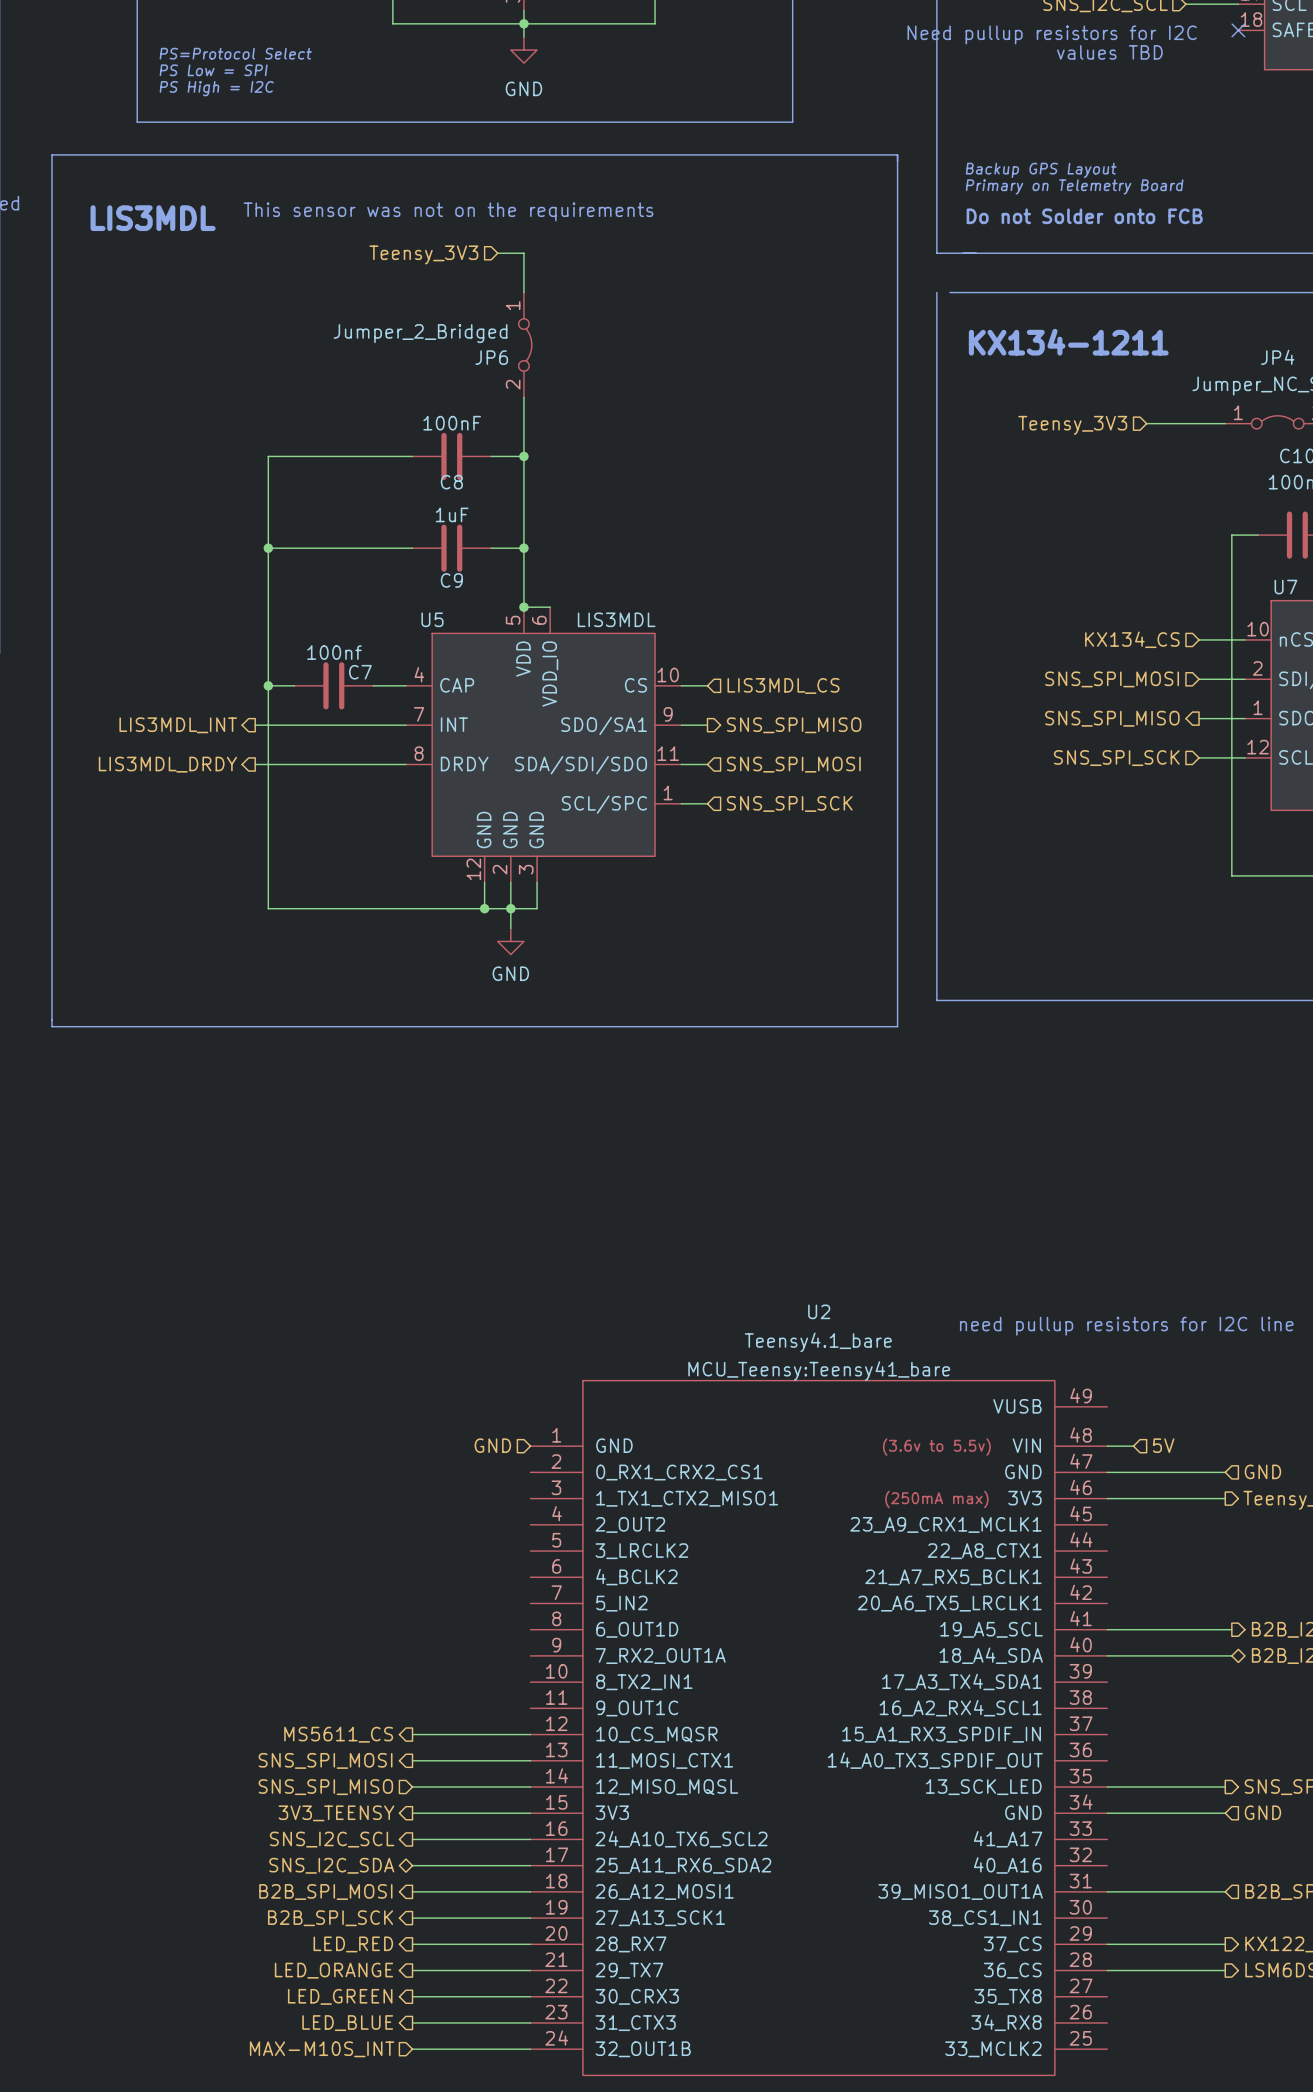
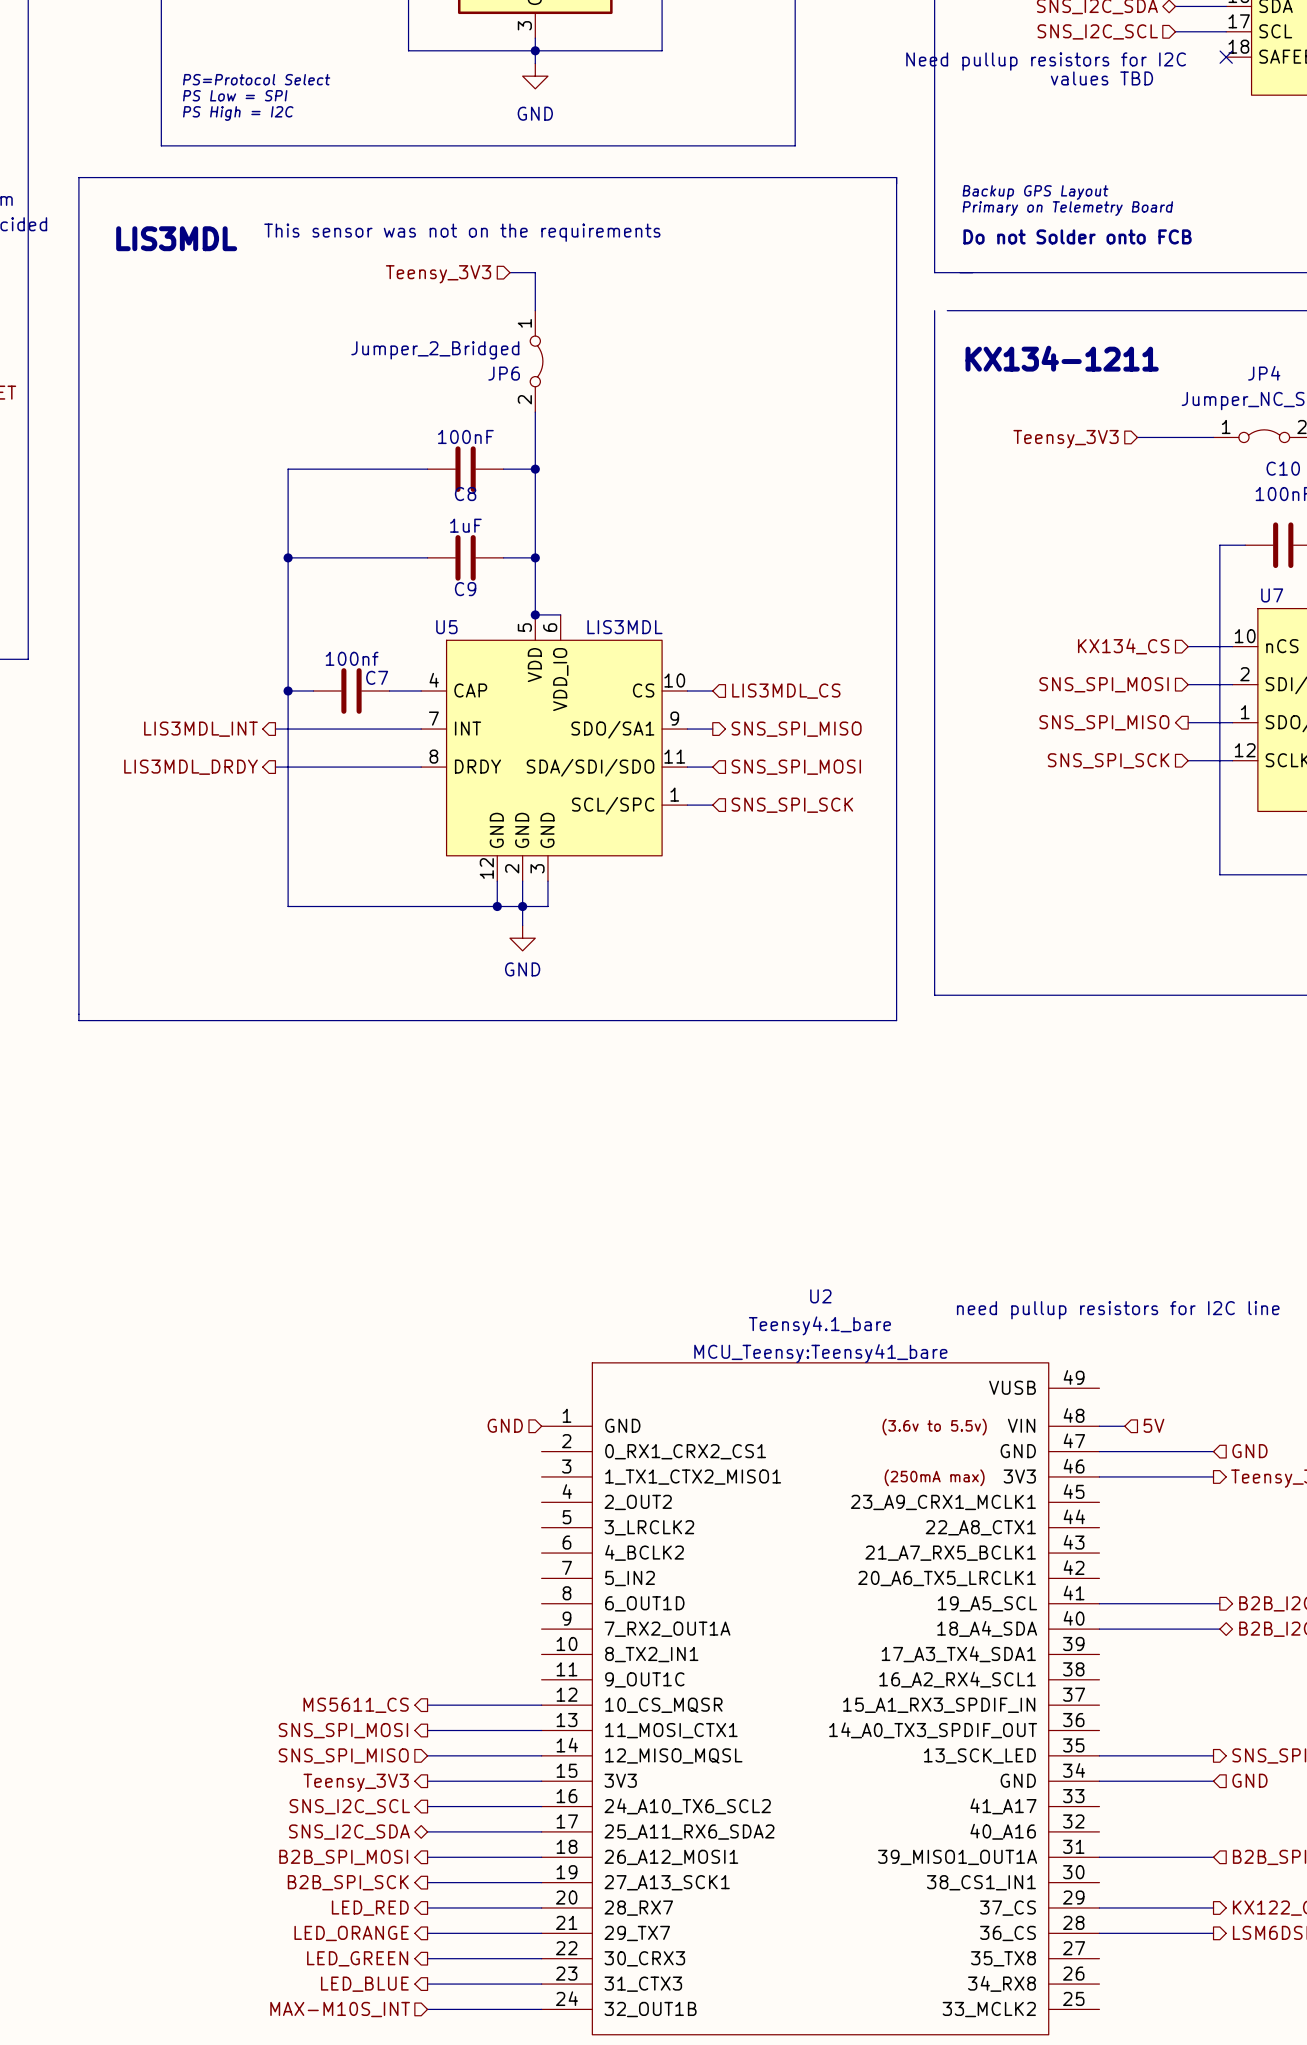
hierarchical label: 3V3_TEENSY (336, 1813) -> Teensy_3V3 (356, 1782)

